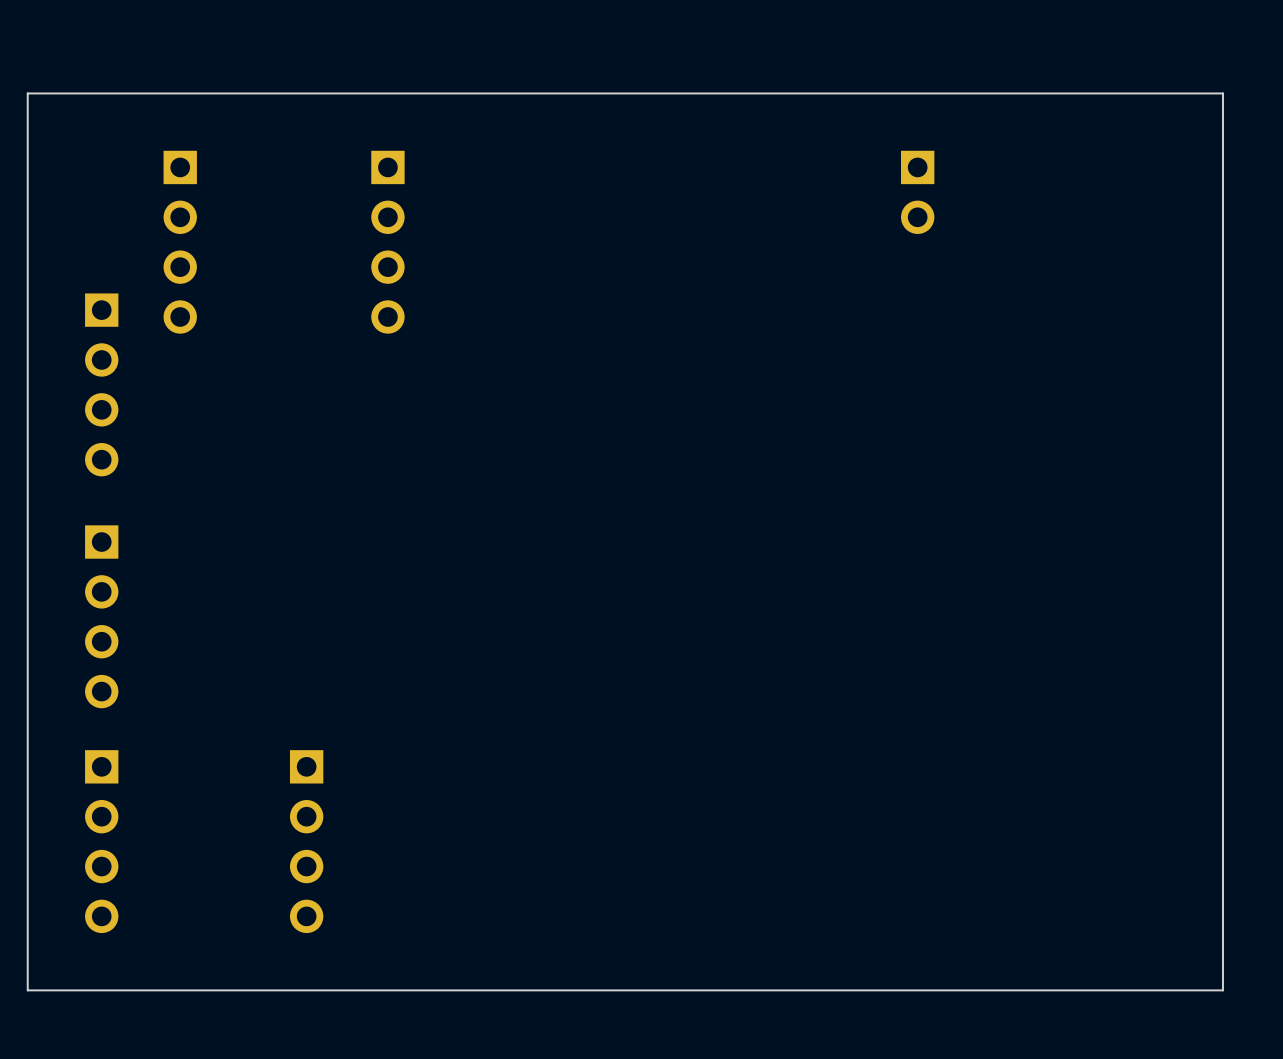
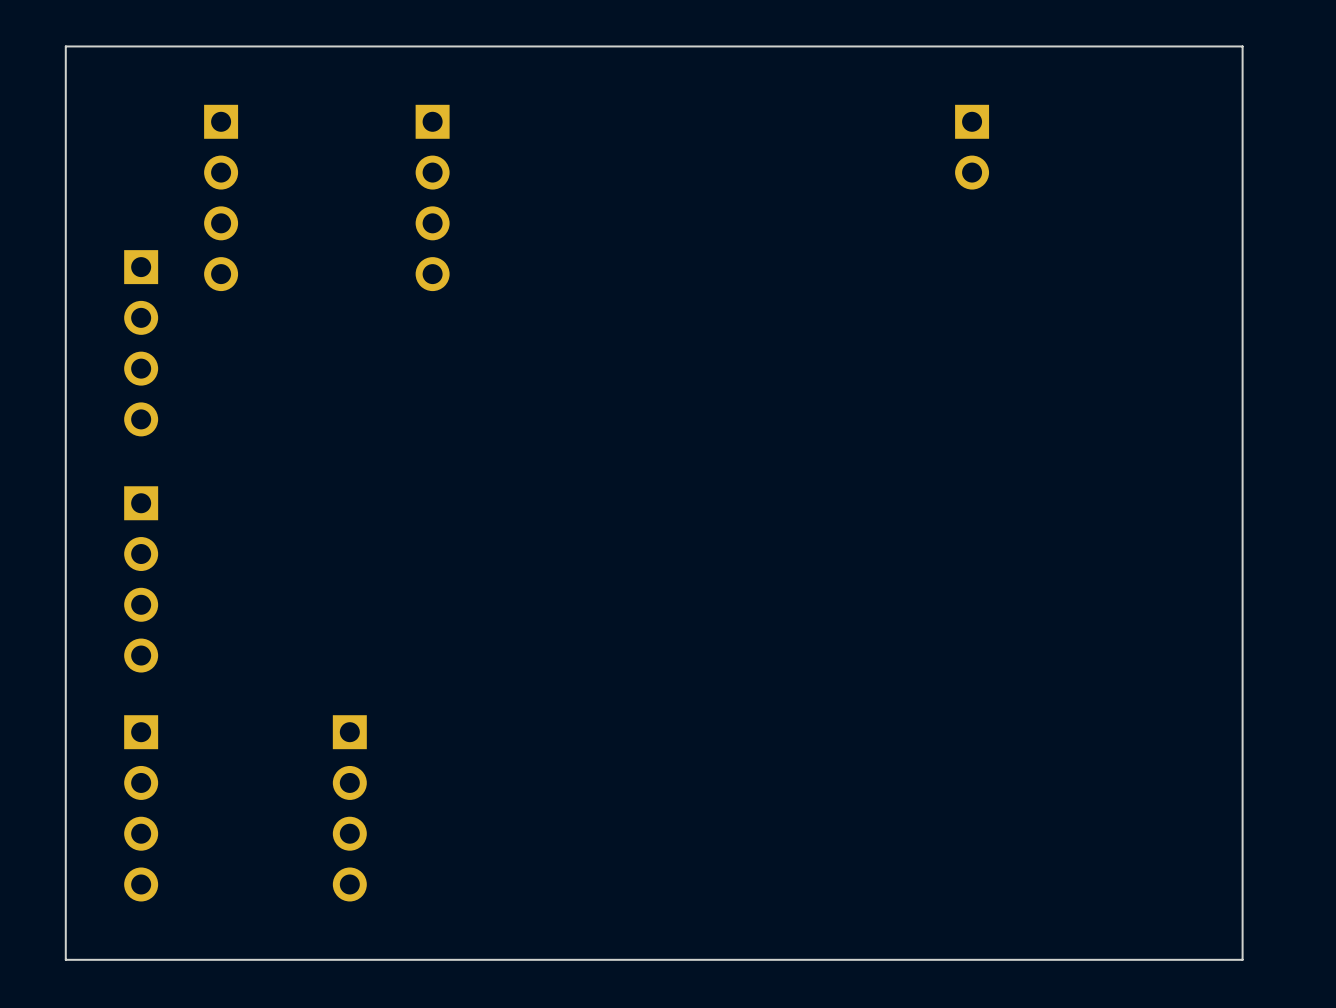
board edge: (1183, 93) (1222, 93) (1222, 990) (1183, 990) -> (1242, 46) (1242, 959)

